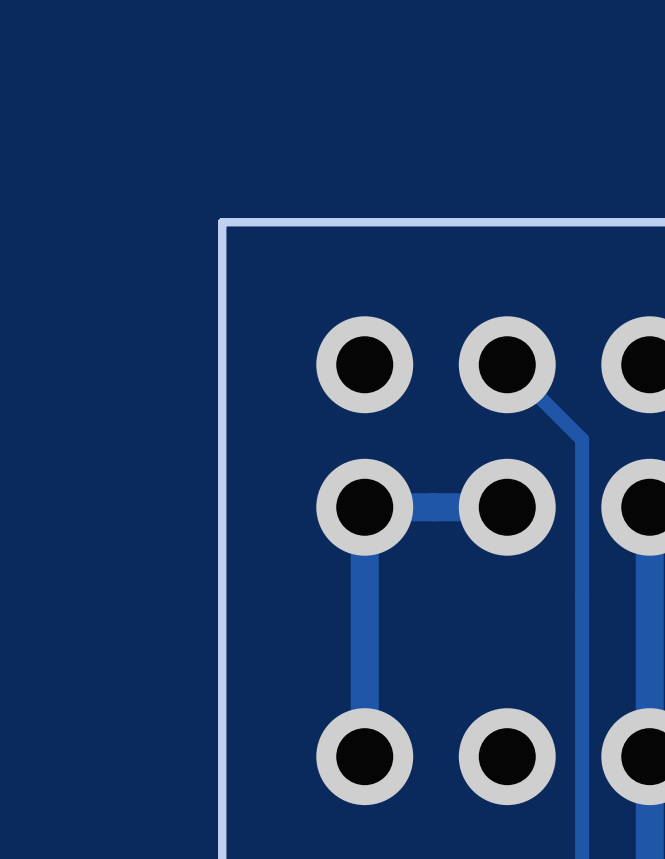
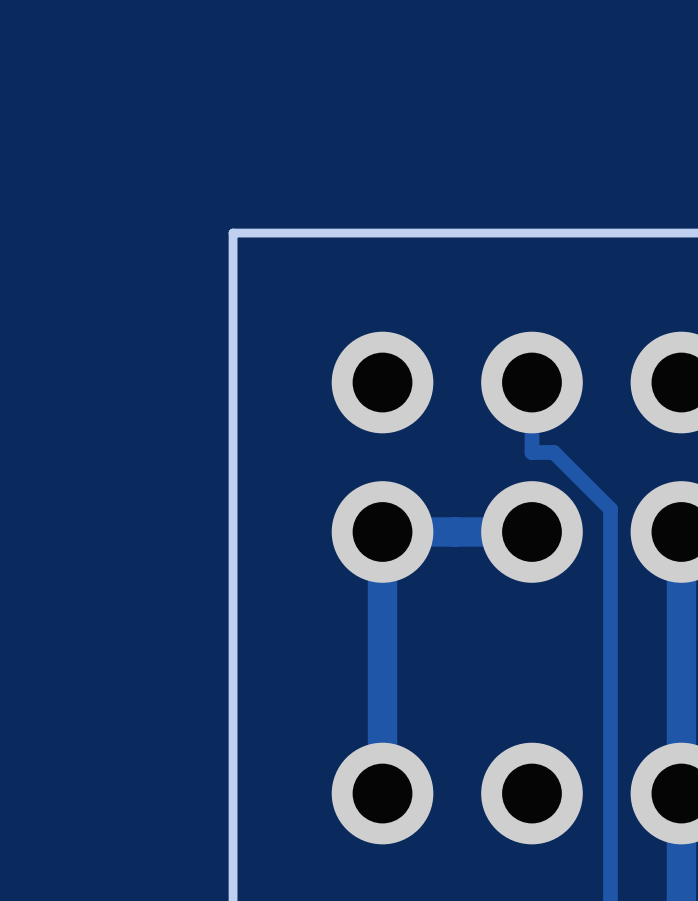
track: (507, 364) (582, 439) (582, 485) -> (531, 382) (531, 452) (553, 452) (610, 509)

